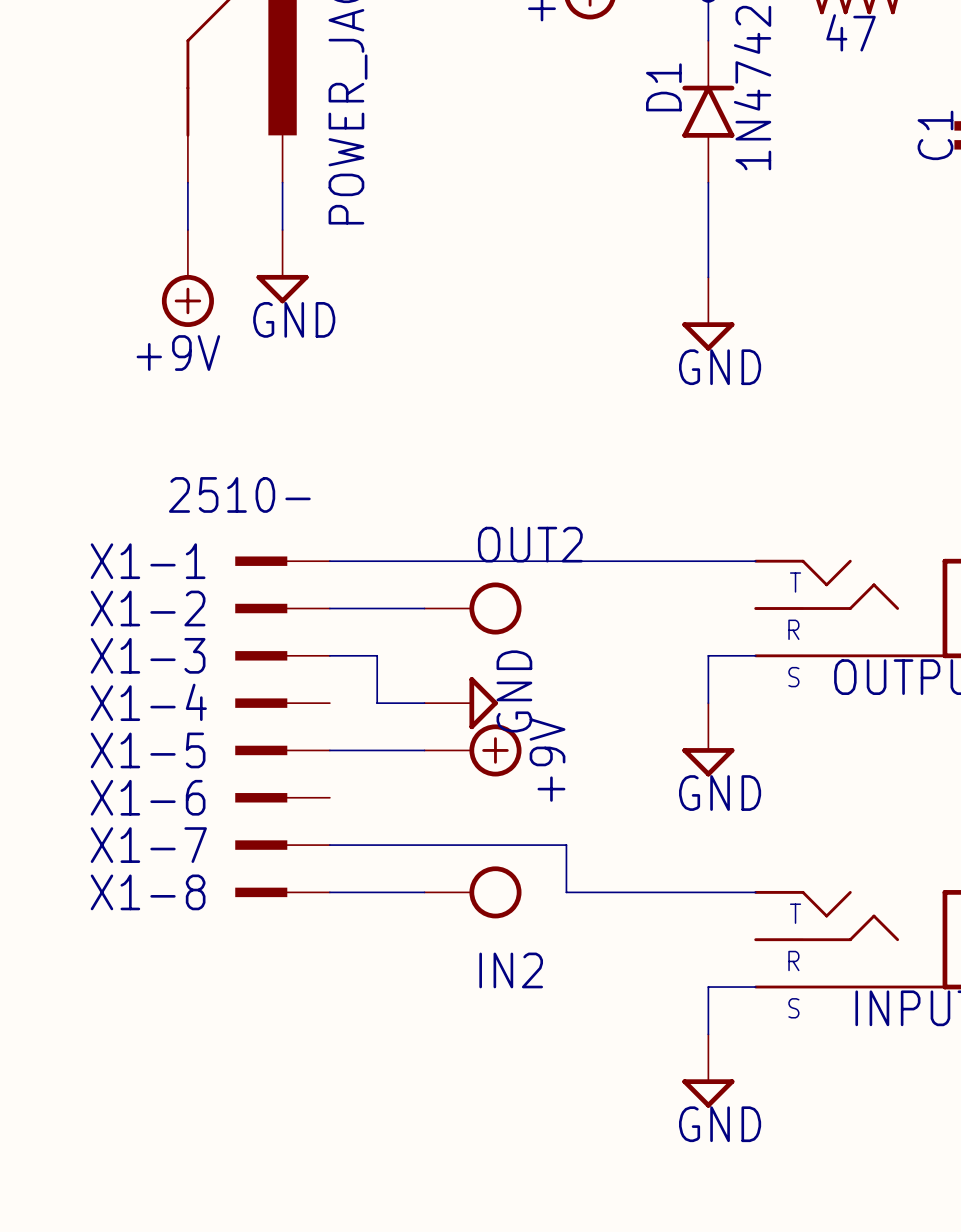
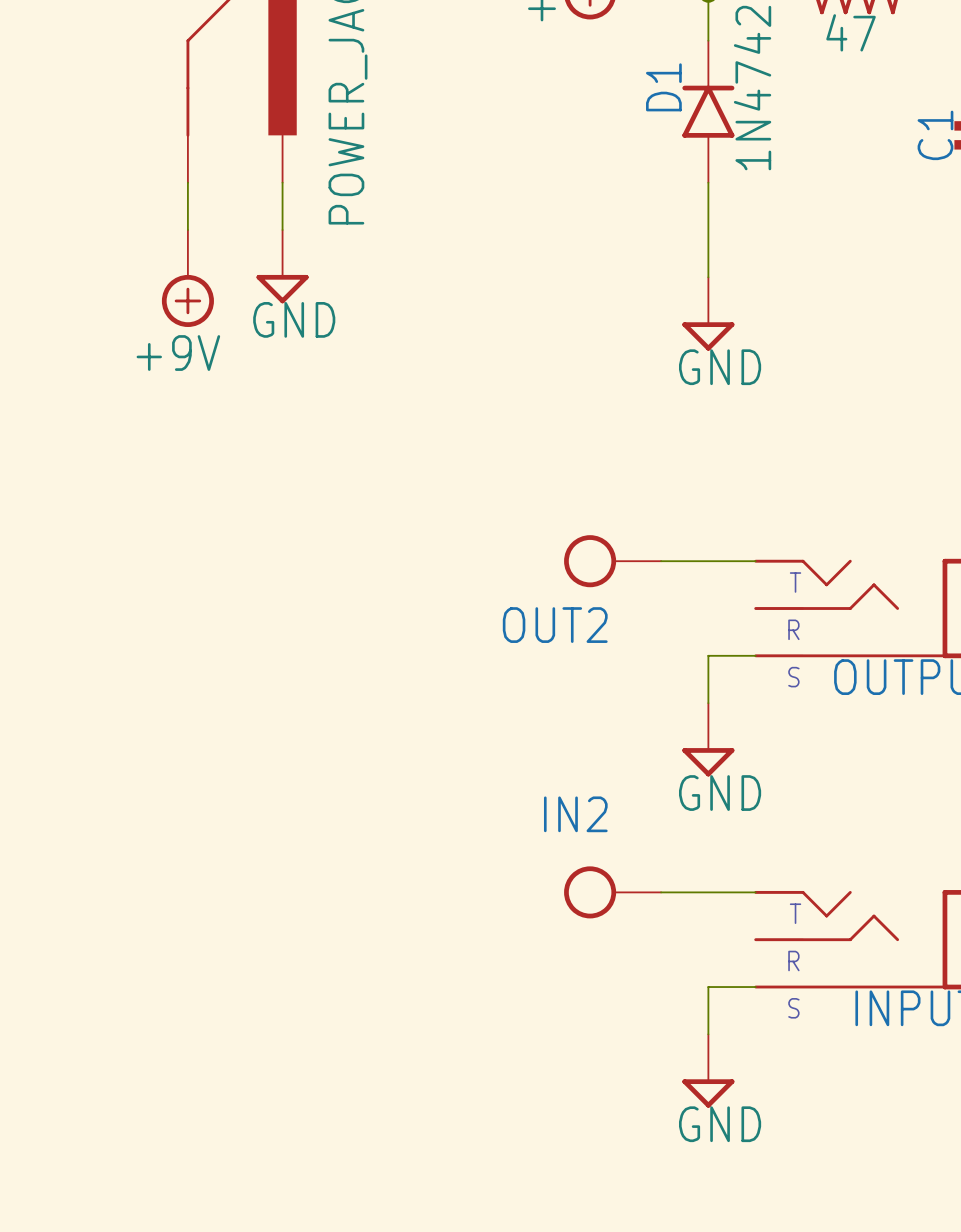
X1-1: 2510- (282, 561) -> none
wire: (329, 561) (661, 561) -> none
X1-2: (282, 608) -> none
wire: (329, 608) (424, 608) -> none
OUT2 position: (472, 608) -> (612, 561)
OUT2 rotation: 0° (495, 608) -> 180° (590, 561)
X1-3: (282, 655) -> none
wire: (329, 655) (377, 655) (377, 703) (424, 703) -> none
X1-4: (282, 703) -> none
power symbol: GND (461, 703) -> none
X1-5: (282, 750) -> none
wire: (329, 750) (424, 750) -> none
power symbol: +9V (472, 750) -> none
X1-6: (282, 797) -> none
X1-7: (282, 845) -> none
wire: (329, 845) (566, 845) (566, 892) (661, 892) -> none
X1-8: (282, 892) -> none
wire: (329, 892) (424, 892) -> none
IN2 position: (472, 892) -> (612, 892)
IN2 rotation: 0° (495, 892) -> 180° (590, 892)

